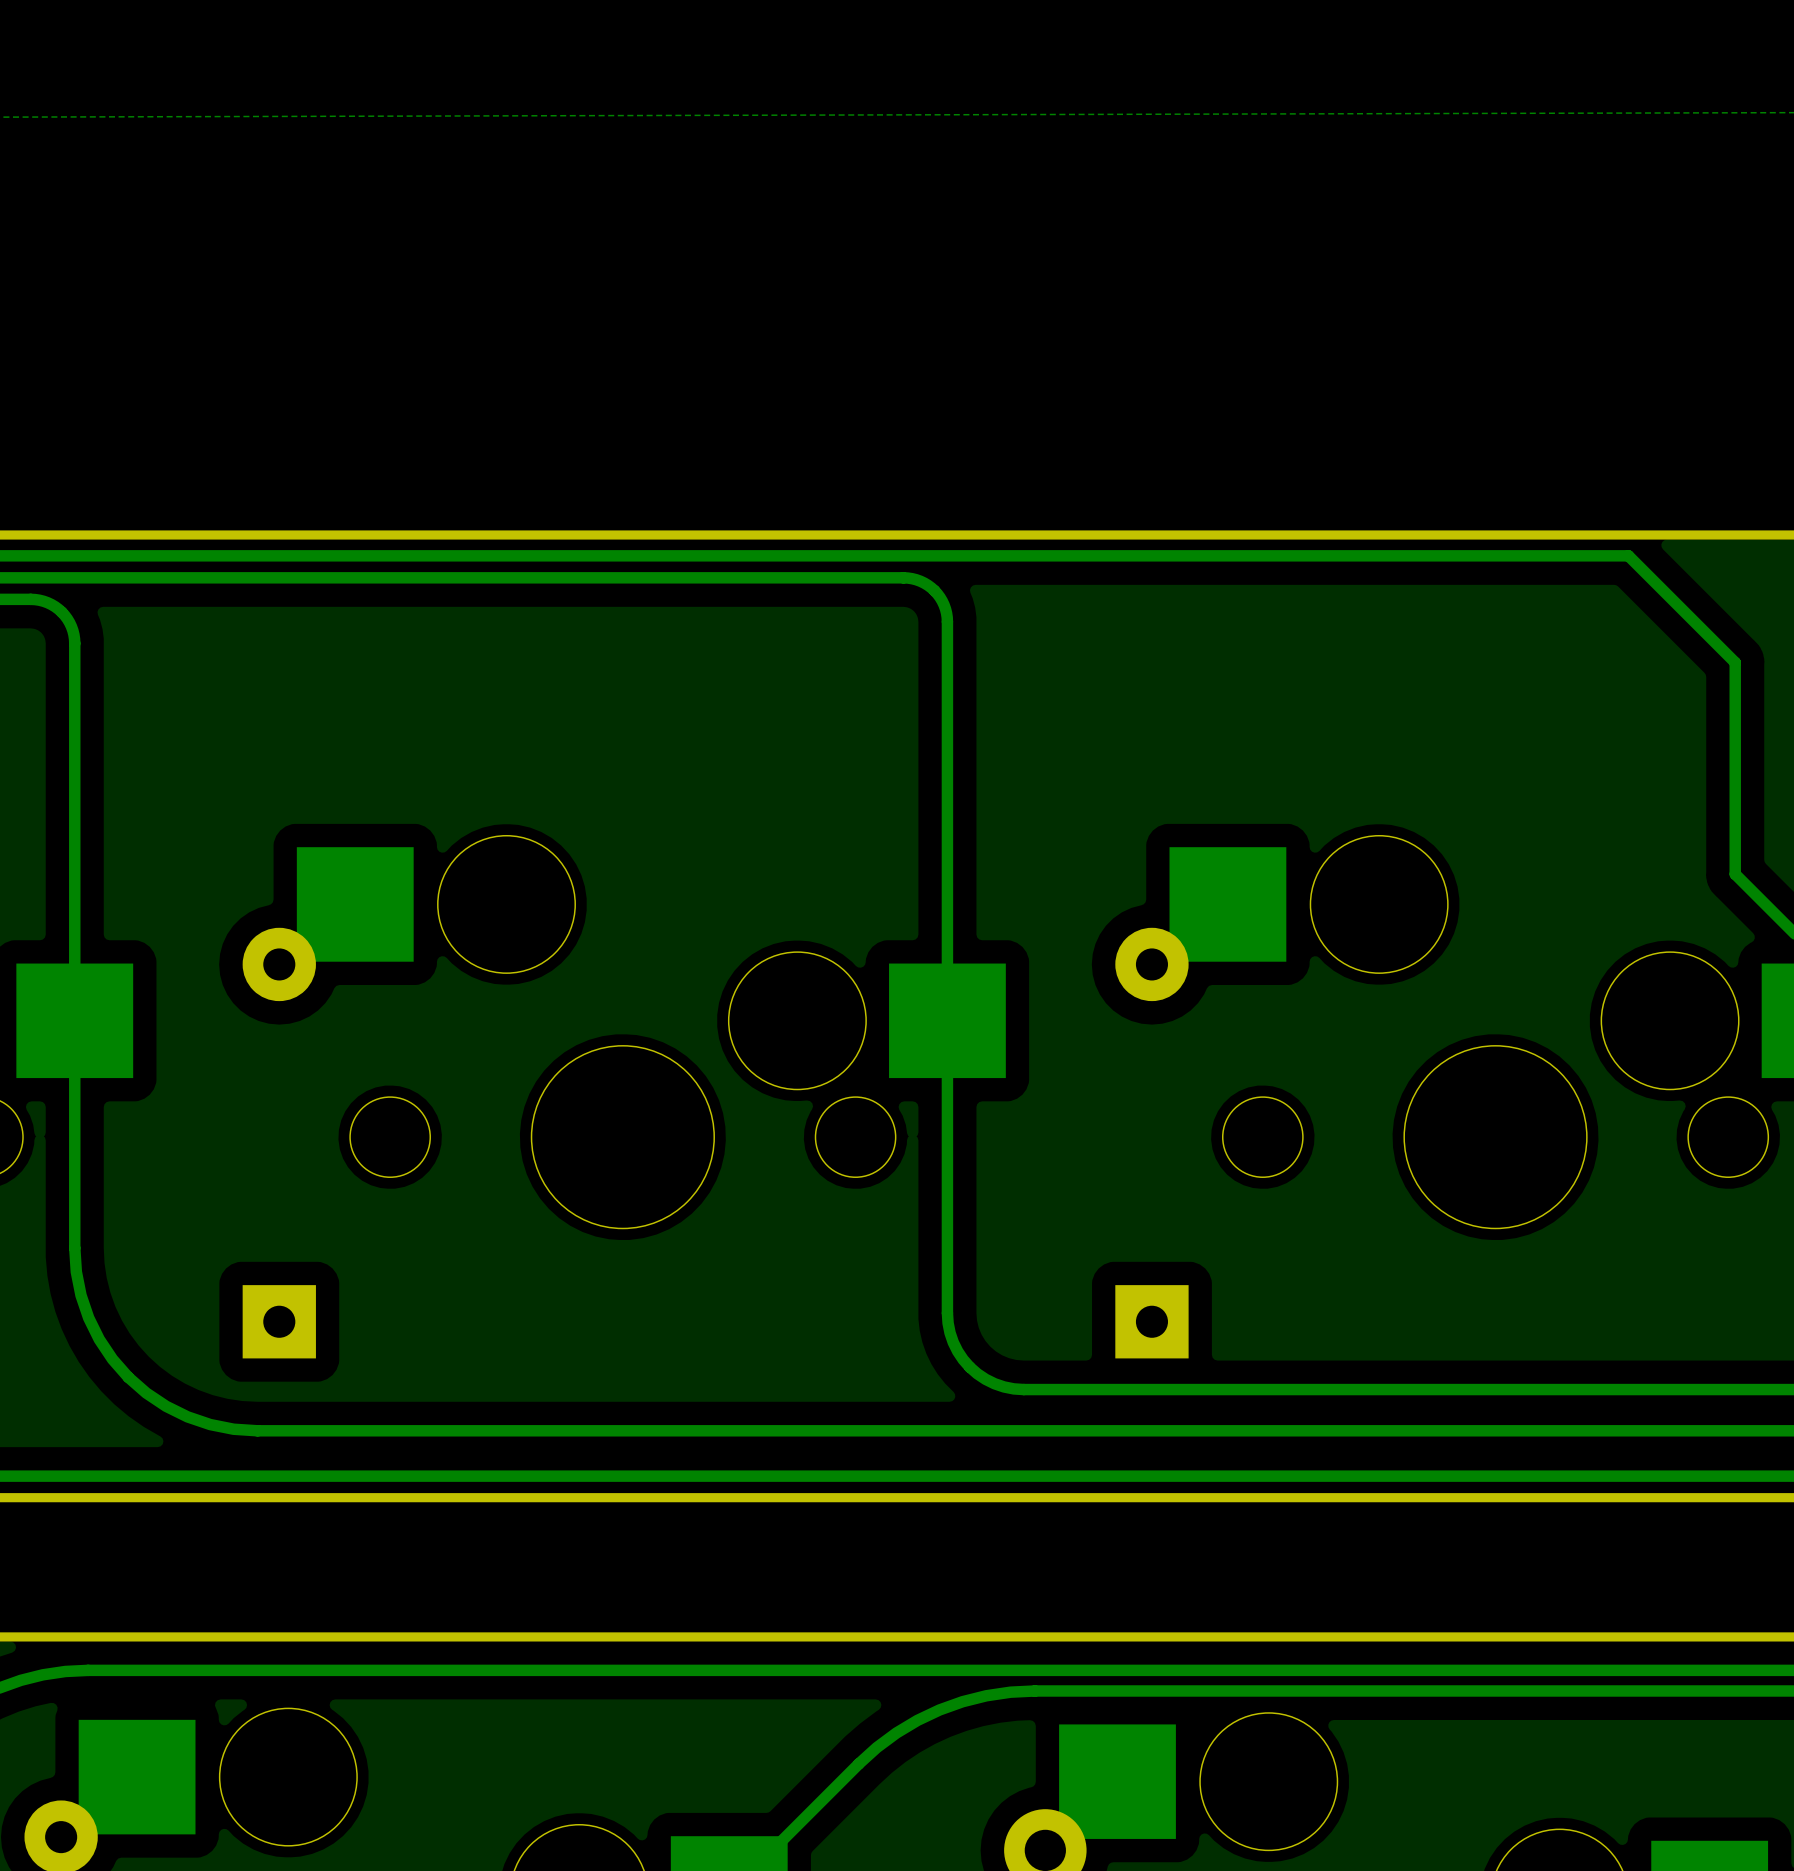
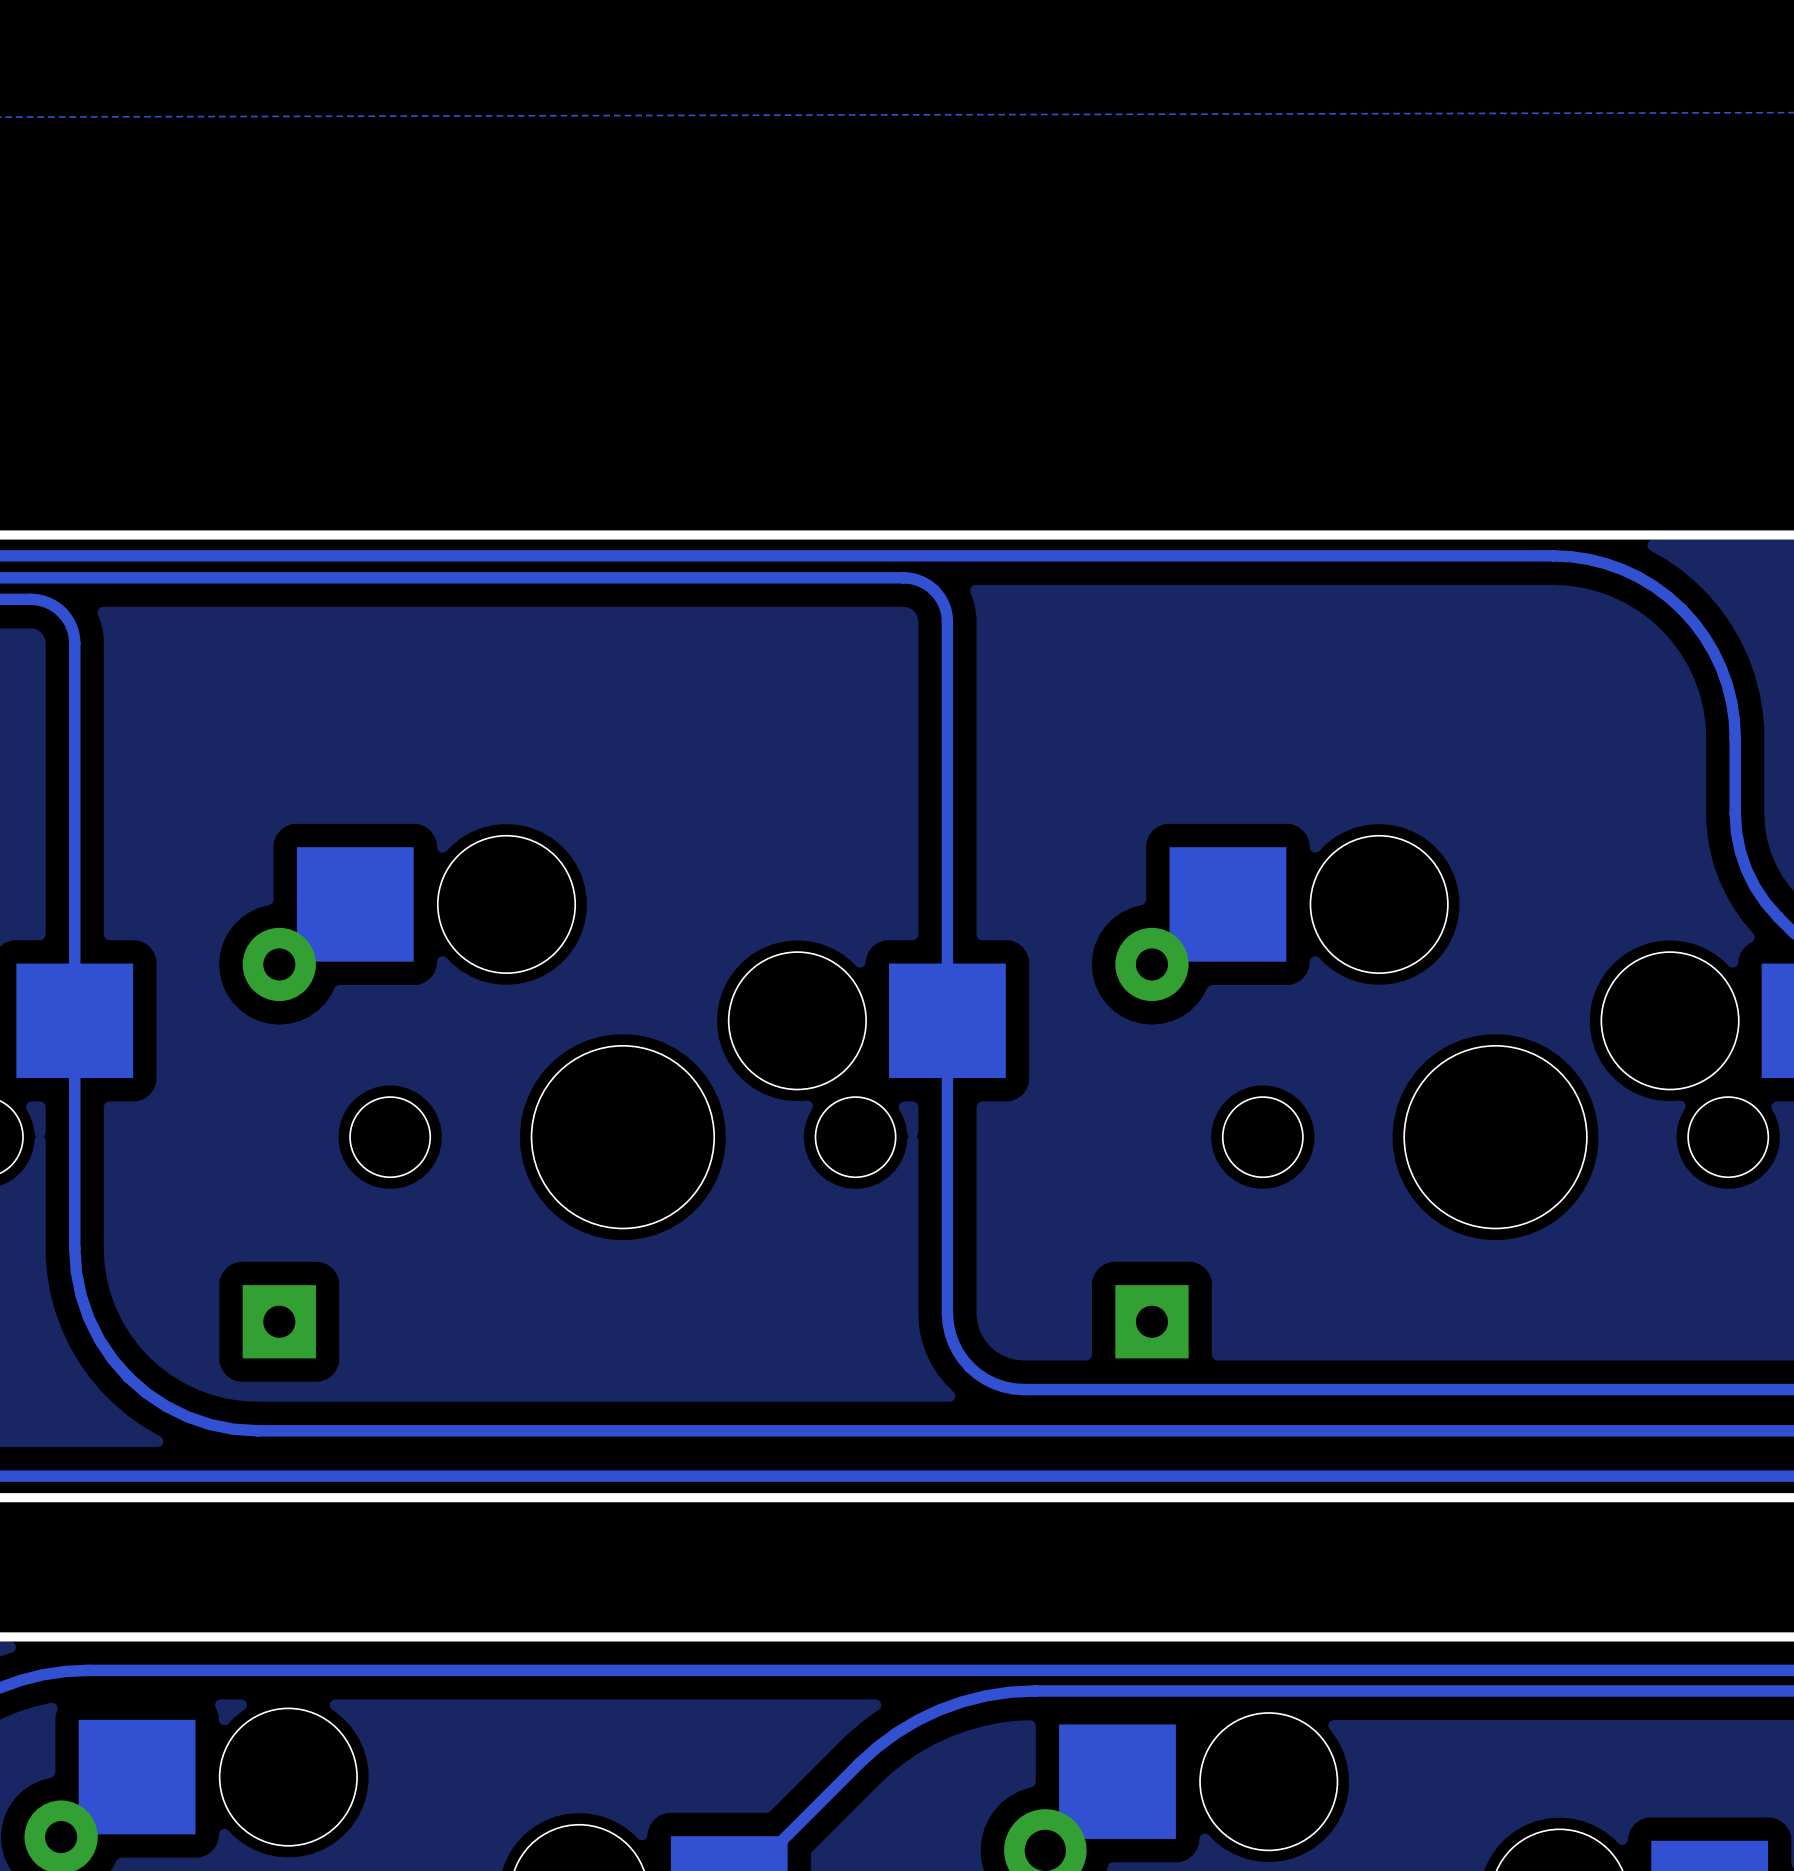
track: (1553, 555) (1628, 555) (1735, 662) (1735, 738) -> (1553, 555) (1588, 559) (1622, 569) (1654, 586) (1681, 609) (1704, 636) (1721, 668) (1731, 702) (1735, 738)
track: (1735, 813) (1735, 874) (1778, 917) -> (1735, 813) (1740, 851) (1746, 869) (1765, 902) (1778, 917)

